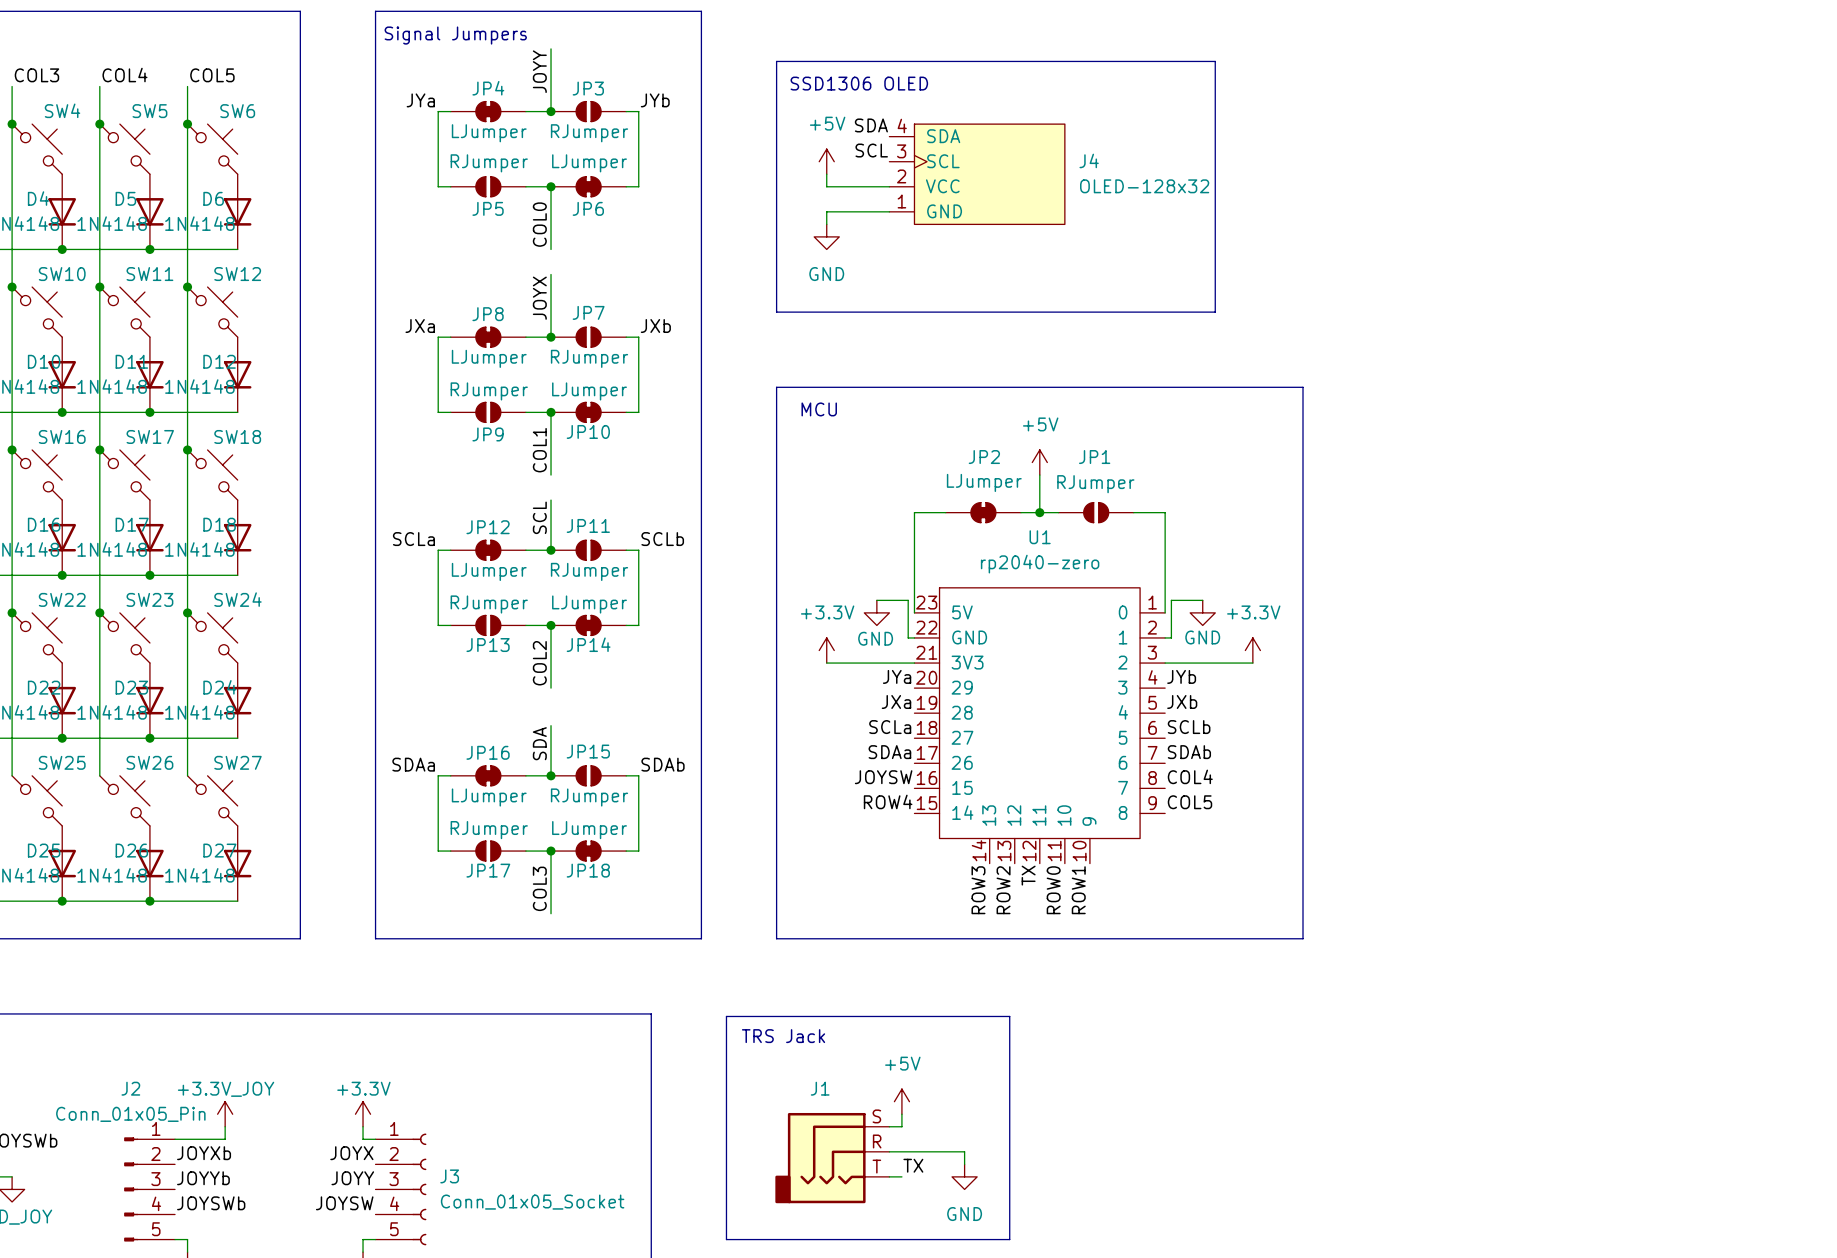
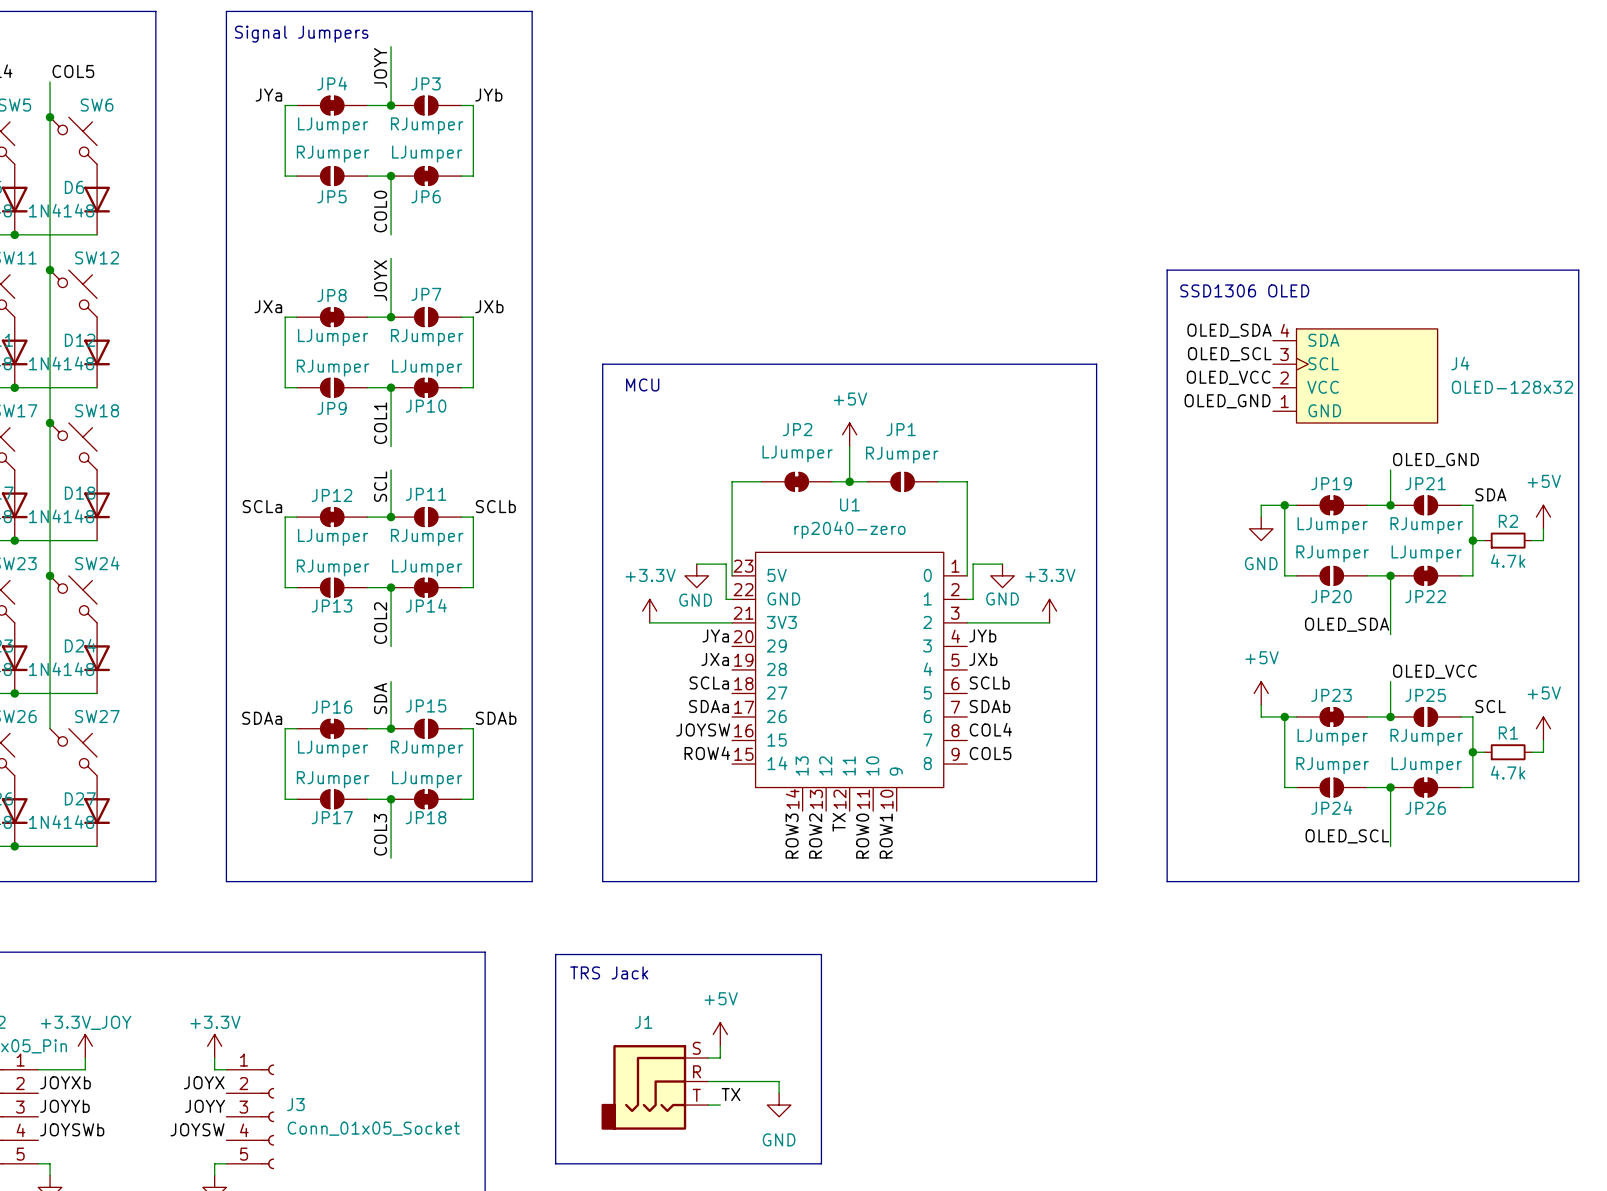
line: (776, 61) (1215, 61) (1215, 312) (776, 312) (776, 61) -> none
text: SSD1306 OLED (859, 83) -> none
label: SDA (871, 125) -> none
label: SCL (871, 150) -> none
power symbol: +5V (826, 161) -> none
wire: (826, 174) (826, 186) (889, 186) -> none
J4 position: (977, 174) -> (1355, 375)
wire: (889, 211) (826, 211) (826, 224) -> none
power symbol: GND (826, 236) -> none
line: none -> (1167, 270) (1578, 270) (1578, 881) (1167, 881) (1167, 270)
text: none -> SSD1306 OLED (1244, 290)
label: none -> OLED_SDA (1229, 330)
label: none -> OLED_SCL (1229, 354)
label: none -> OLED_VCC (1228, 377)
label: none -> OLED_GND (1227, 401)
label: none -> OLED_GND (1436, 460)
wire: none -> (1390, 470) (1390, 505) (1367, 505)
label: none -> SDA (1490, 494)
wire: none -> (1284, 505) (1284, 575) (1296, 575)
junction: none -> (1284, 505)
wire: none -> (1296, 505) (1261, 505) (1261, 517)
JP19: none -> LJumper (1331, 505)
junction: none -> (1390, 505)
JP21: none -> RJumper (1425, 505)
wire: none -> (1461, 505) (1472, 505) (1472, 575) (1461, 575)
power symbol: none -> +5V (1543, 517)
power symbol: none -> GND (1261, 528)
wire: none -> (1543, 528) (1543, 540) (1531, 540)
wire: none -> (1472, 540) (1484, 540)
junction: none -> (1472, 540)
R2: none -> 4.7k (1508, 540)
JP20: none -> RJumper (1331, 575)
wire: none -> (1367, 575) (1390, 575) (1390, 634)
junction: none -> (1390, 575)
JP22: none -> LJumper (1425, 575)
label: none -> OLED_SDA (1347, 624)
label: none -> OLED_VCC (1434, 671)
wire: none -> (1390, 681) (1390, 716) (1367, 716)
power symbol: none -> +5V (1261, 693)
wire: none -> (1261, 705) (1261, 716) (1296, 716)
label: none -> SCL (1490, 706)
wire: none -> (1284, 716) (1284, 787) (1296, 787)
junction: none -> (1284, 716)
JP23: none -> LJumper (1331, 716)
junction: none -> (1390, 716)
JP25: none -> RJumper (1425, 716)
wire: none -> (1461, 716) (1472, 716) (1472, 787) (1461, 787)
power symbol: none -> +5V (1543, 728)
wire: none -> (1543, 740) (1543, 752) (1531, 752)
wire: none -> (1472, 752) (1484, 752)
junction: none -> (1472, 752)
R1: none -> 4.7k (1508, 752)
JP24: none -> RJumper (1331, 787)
wire: none -> (1367, 787) (1390, 787) (1390, 846)
junction: none -> (1390, 787)
JP26: none -> LJumper (1425, 787)
label: none -> OLED_SCL (1347, 836)

